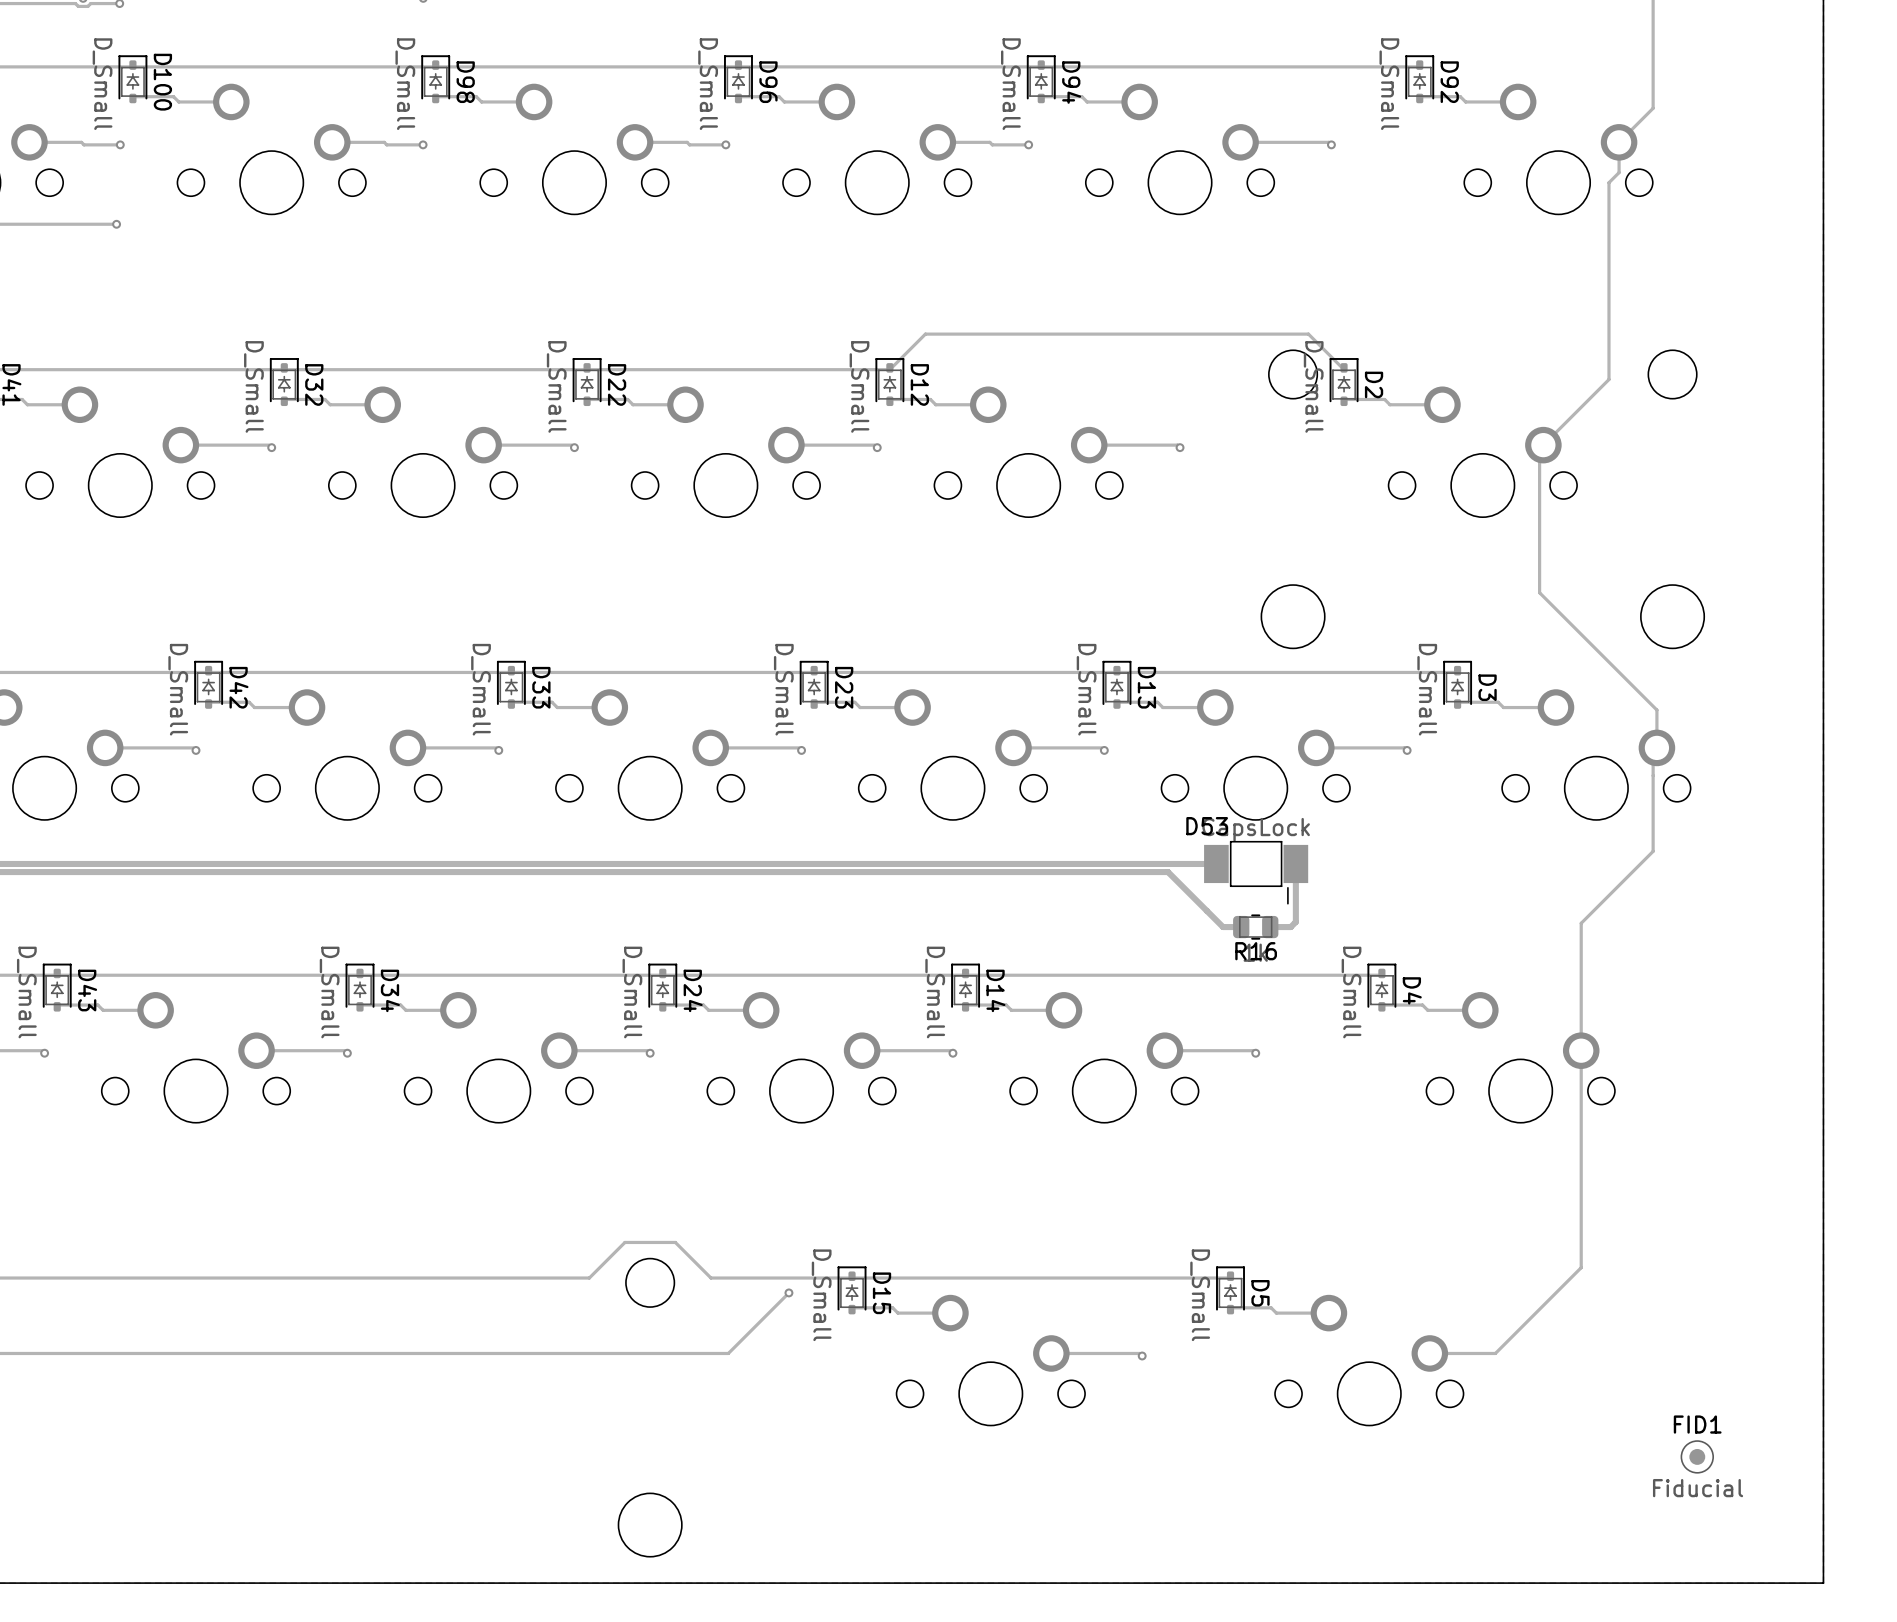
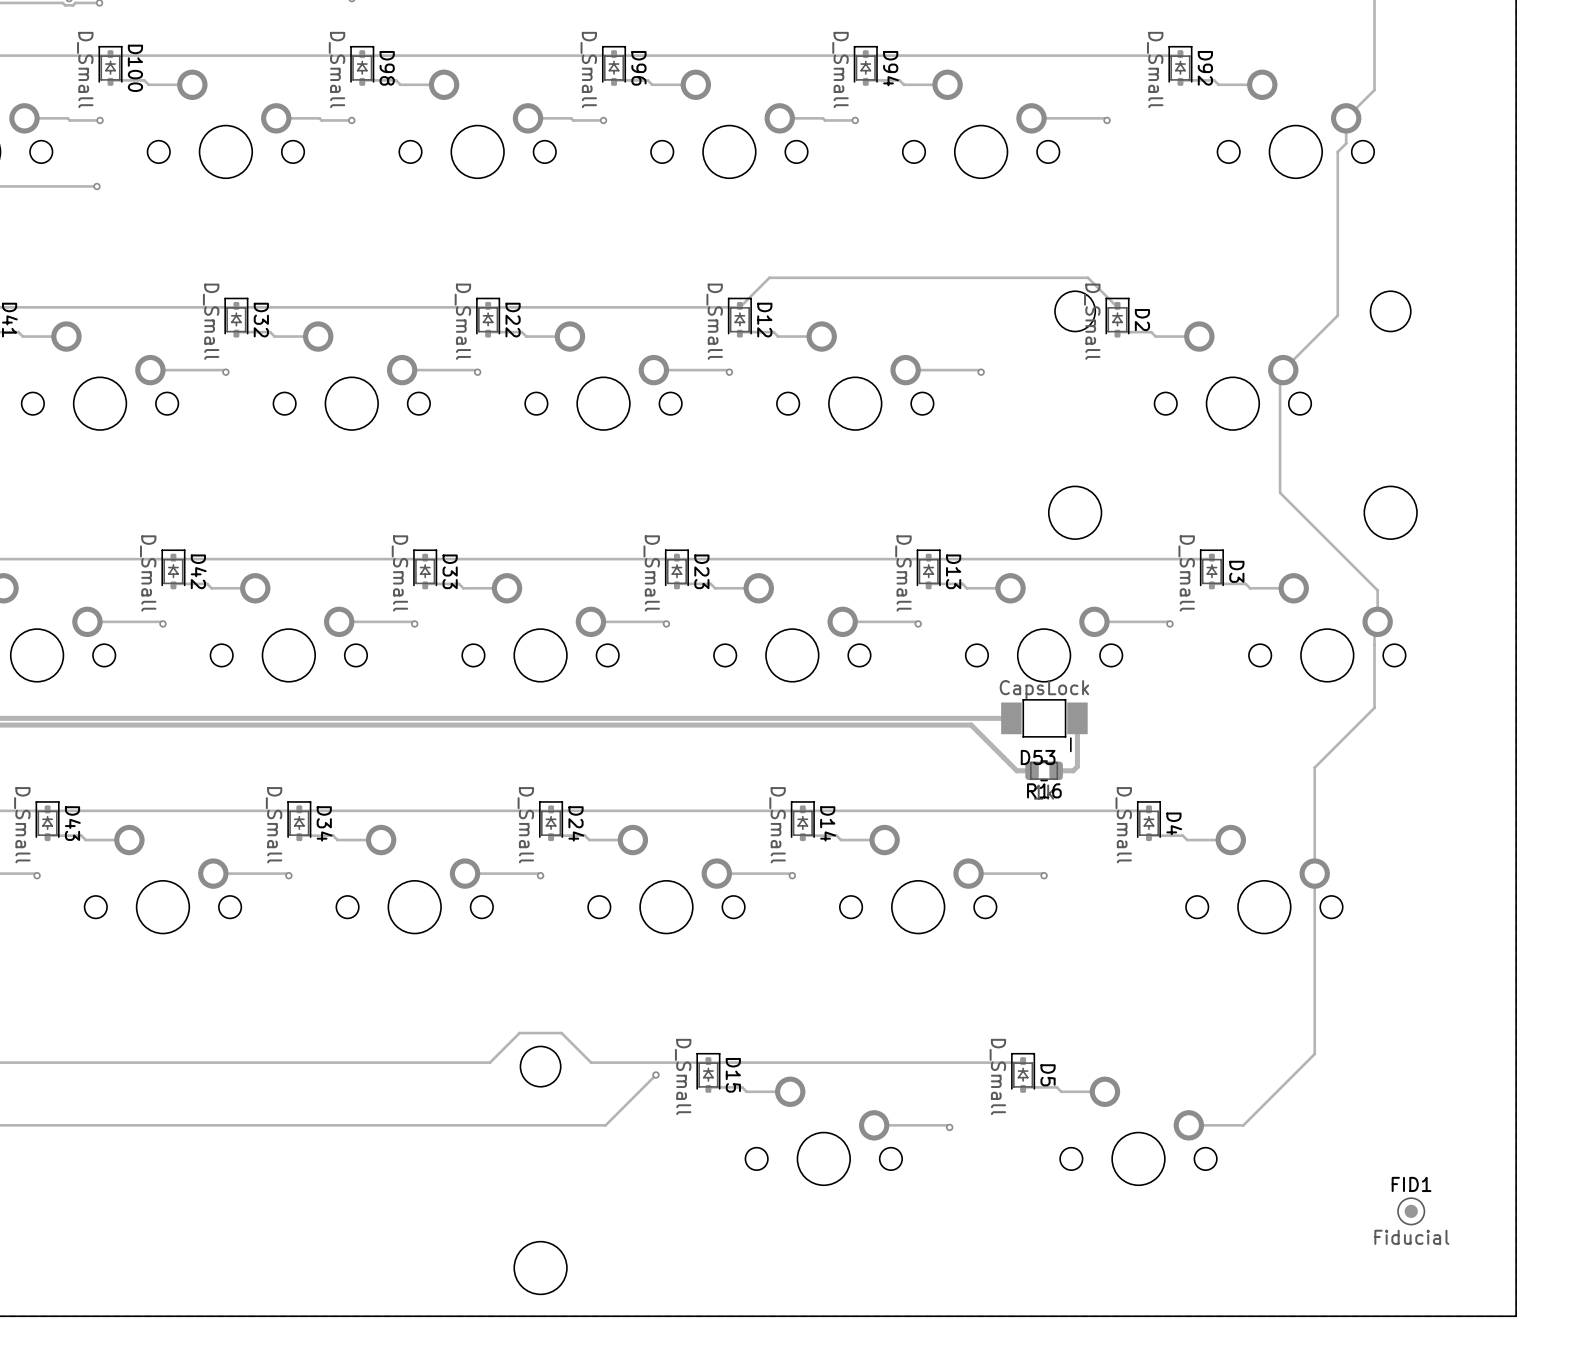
D53 name position: D53 (1207, 826) -> D53 (1038, 757)

